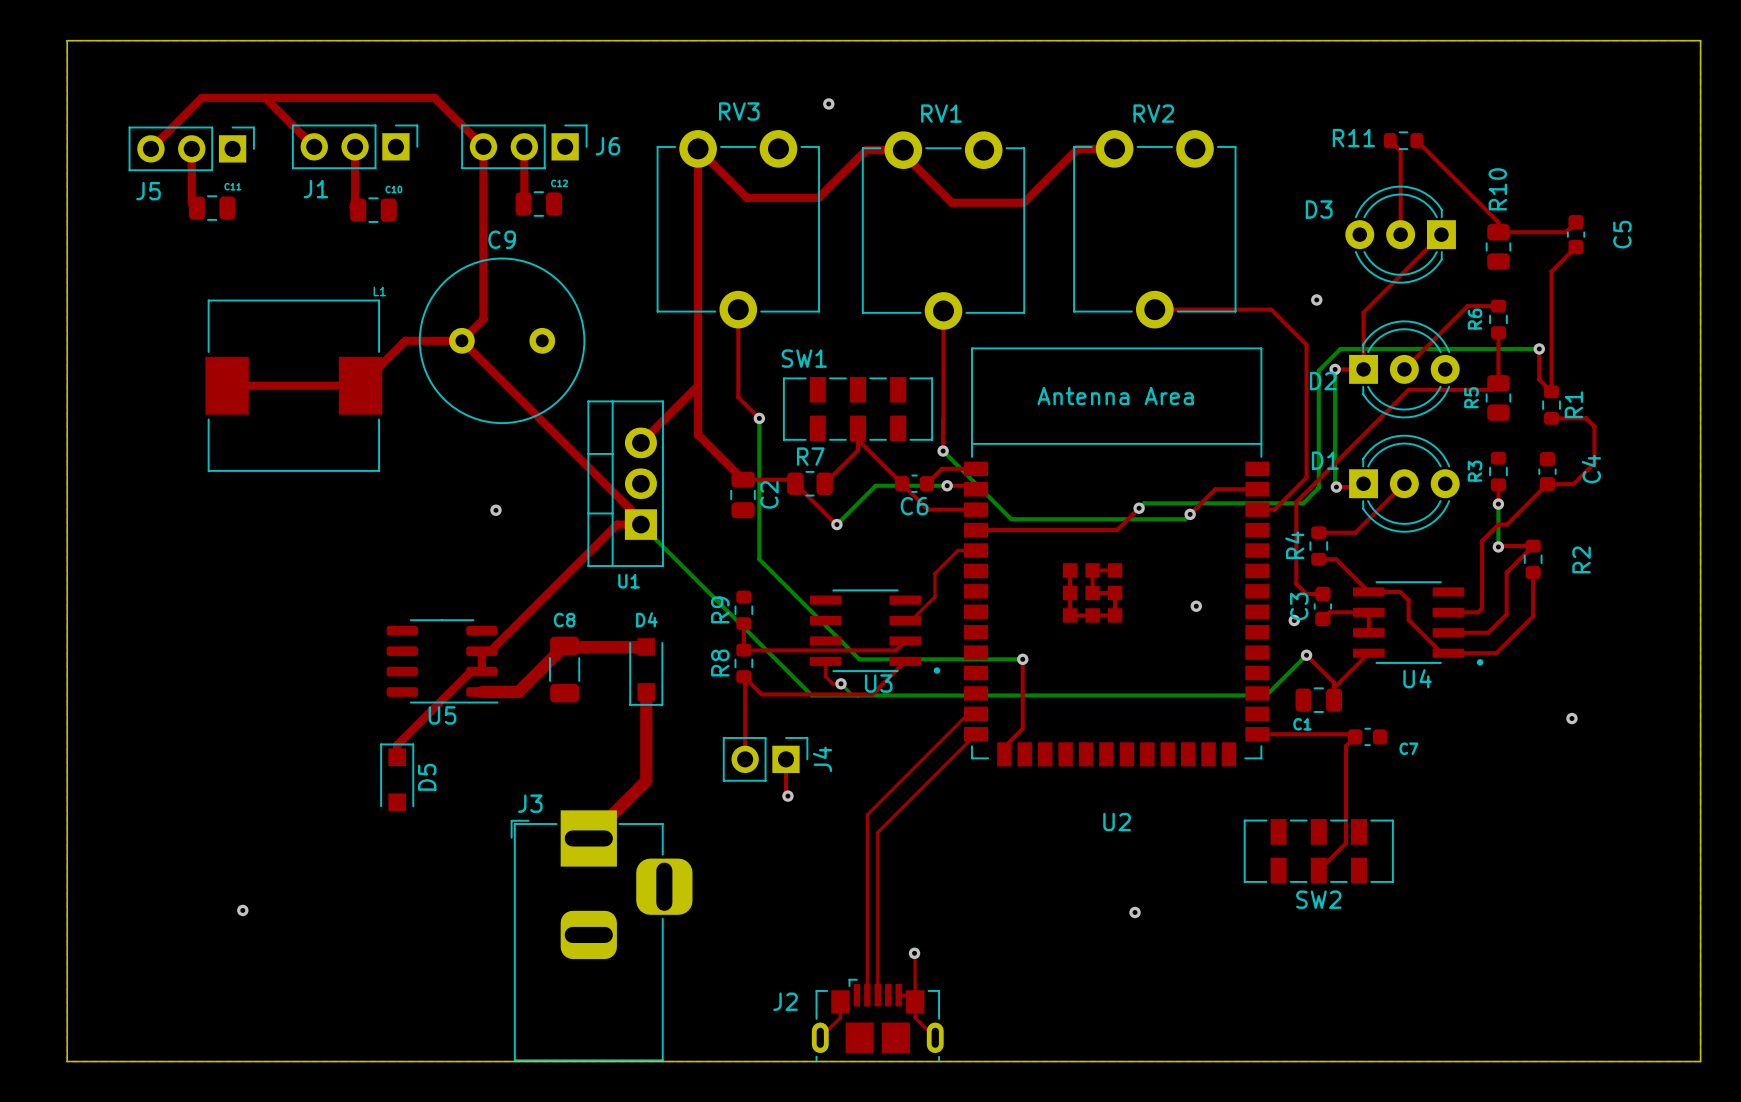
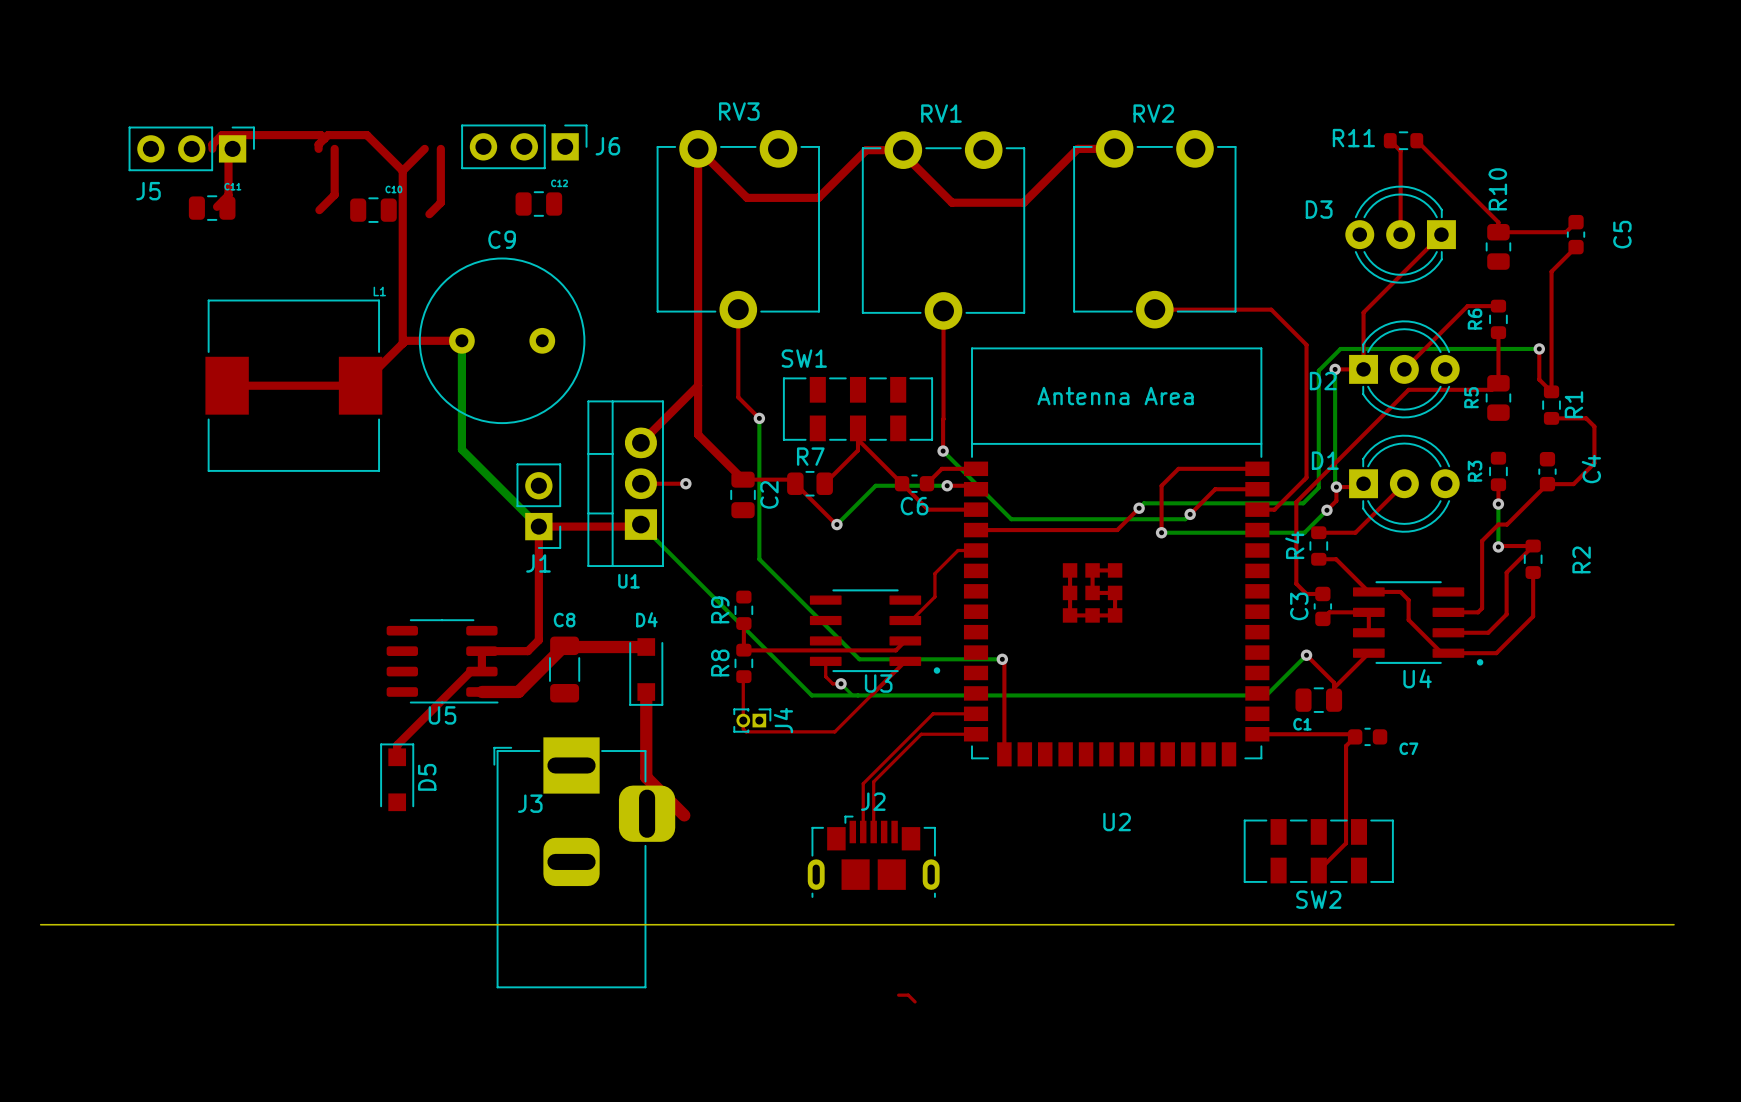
board edge: (67, 40) (1700, 40) (1700, 1061) (67, 1061) (67, 40) -> none
top track: (265, 97) (314, 146) -> none
via: (828, 103) -> none
J1 footprint: [291, 124, 419, 170] -> [516, 463, 562, 549]
top track: none -> (324, 138) (320, 135) (221, 135) (212, 144) (212, 148)
top track: (355, 146) (355, 207) (358, 210) -> none
top track: (524, 146) (523, 204) -> none
top track: (150, 148) (201, 97) (434, 97) (483, 146) (483, 319) (461, 340) (640, 519) (640, 524) (616, 524) (490, 651) -> (640, 524) (638, 526) (538, 526) (538, 640) (527, 651) (490, 651)
top track: (191, 148) (191, 202) (196, 208) -> none
top track: none -> (228, 148) (228, 195) (217, 206)
top track: none -> (318, 148) (318, 144) (328, 135) (366, 135) (402, 170)
top track: none -> (334, 148) (334, 194) (319, 210)
top track: none -> (424, 148) (402, 170)
top track: none -> (440, 148) (440, 202) (429, 214)
top track: none -> (402, 170) (402, 343)
J1 name position: J1 (315, 189) -> J1 (538, 563)
via: (1316, 299) -> none
bottom track: none -> (461, 340) (461, 449) (538, 526)
top track: none -> (1257, 468) (1178, 468) (1161, 485) (1161, 532)
top track: none -> (640, 483) (685, 483)
via: none -> (685, 483)
top track: none -> (1336, 487) (1336, 500) (1326, 510)
via: (495, 510) -> none
bottom track: none -> (1326, 510) (1304, 532) (1161, 532)
via: none -> (1326, 510)
via: none -> (1161, 532)
via: (1196, 606) -> none
via: (1294, 620) -> none
top track: none -> (1002, 659) (1004, 661) (1004, 754)
bottom track: (1002, 659) (1022, 659) -> none
top track: (1022, 659) (1022, 728) (1008, 743) -> none
via position: (1022, 659) -> (1002, 659)
top track: (872, 694) (761, 694) (743, 676) (745, 759) -> (872, 694) (834, 731) (746, 731) (743, 728) (743, 676)
top track: (968, 713) (867, 814) (867, 995) -> (968, 713) (933, 713) (863, 783) (863, 832)
via: (1571, 718) -> none
top track: (976, 734) (877, 832) (877, 995) -> (976, 734) (921, 734) (873, 781) (873, 832)
J4 footprint: [722, 737, 809, 782] -> [733, 708, 772, 733]
top track: (785, 759) (785, 794) (787, 796) -> none
top track: (646, 777) (646, 781) (588, 838) -> (646, 777) (684, 815)
via: (787, 796) -> none
via: (242, 910) -> none
via: (1135, 912) -> none
board edge: none -> (40, 924) (1674, 924)
J3 position: (601, 935) -> (584, 862)
top track: (914, 953) (915, 1017) (935, 1037) -> none
via: (914, 953) -> none
J2 name position: J2 (785, 1001) -> J2 (873, 801)
top track: (840, 1001) (840, 1017) (820, 1037) -> none
J2 position: (877, 1019) -> (873, 856)

